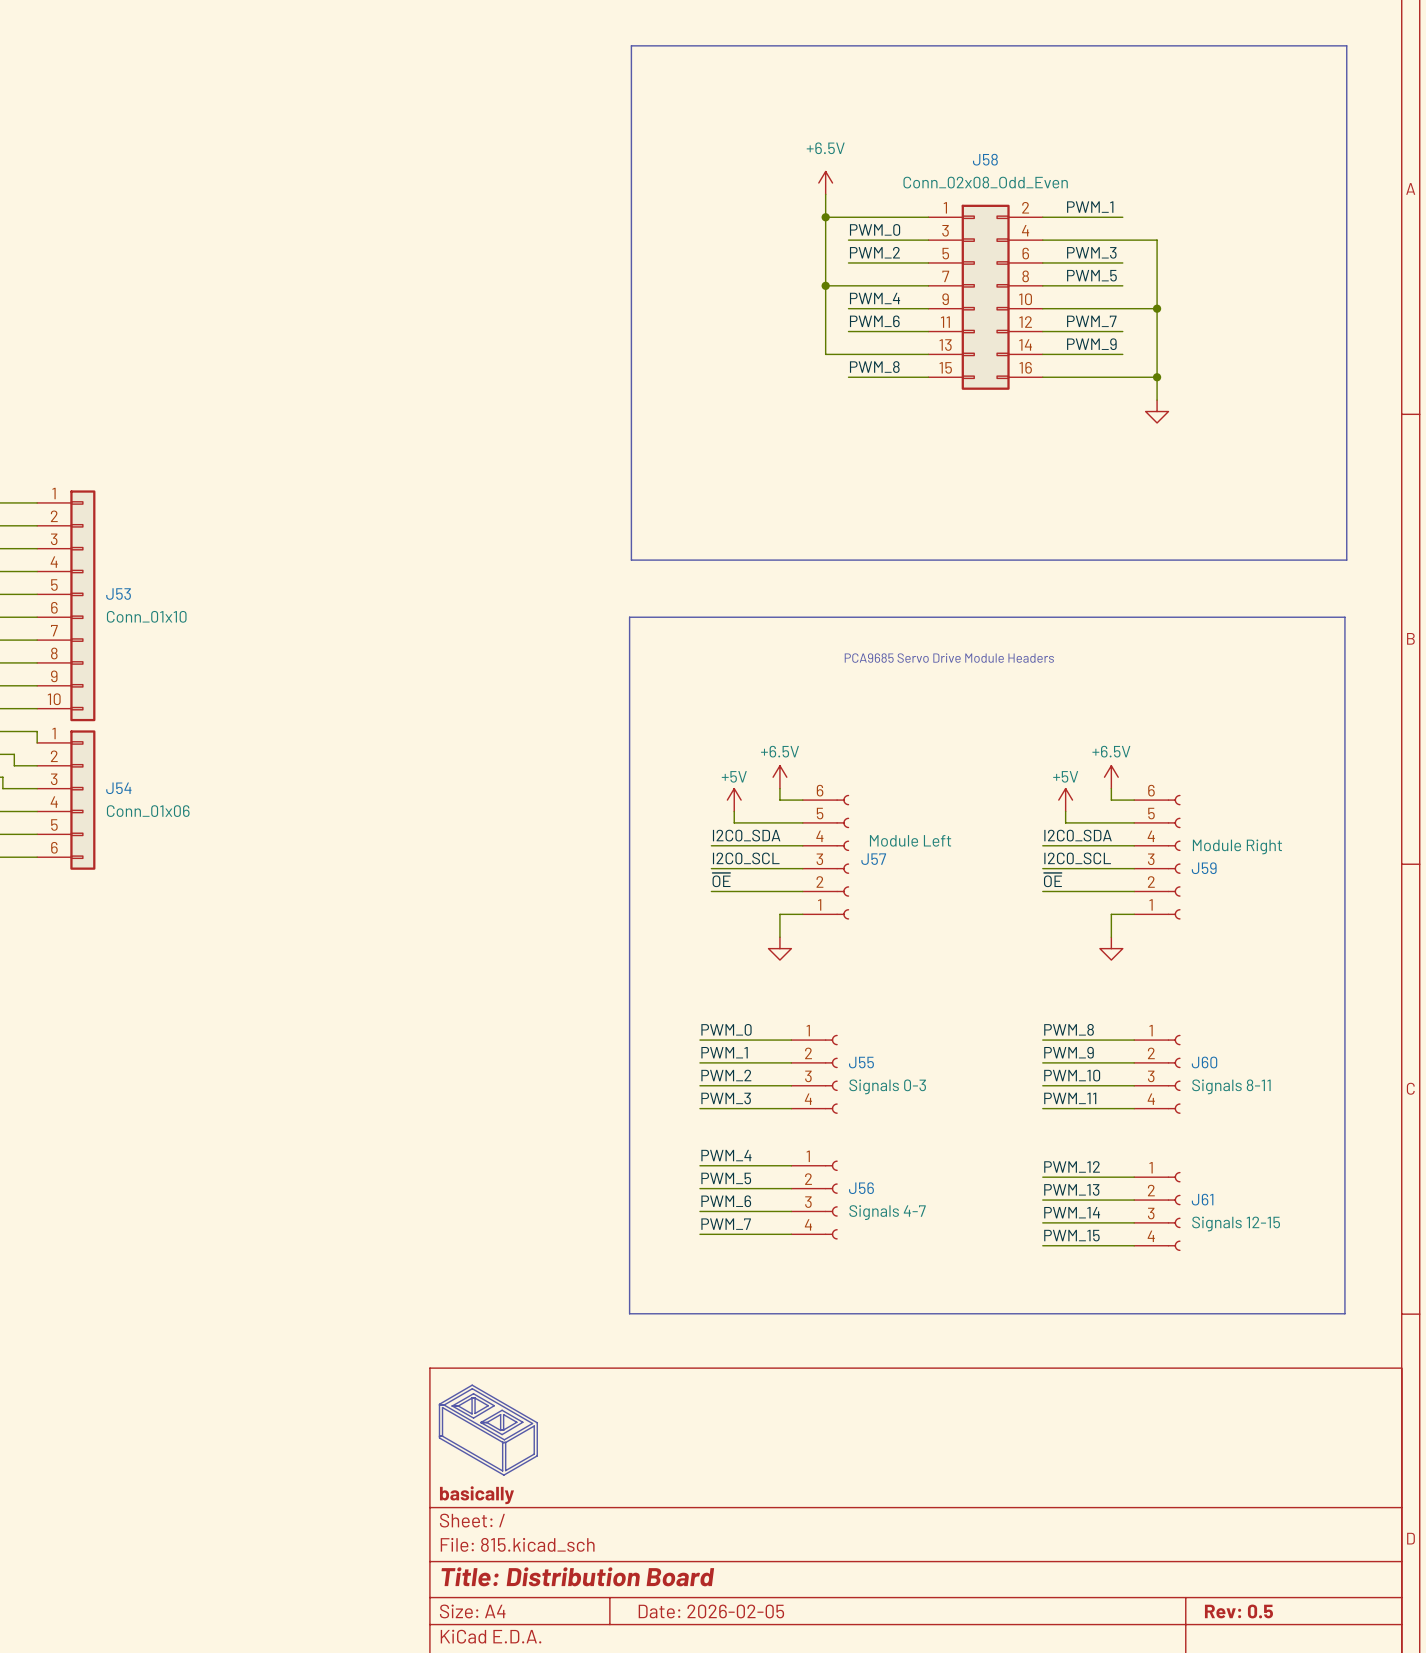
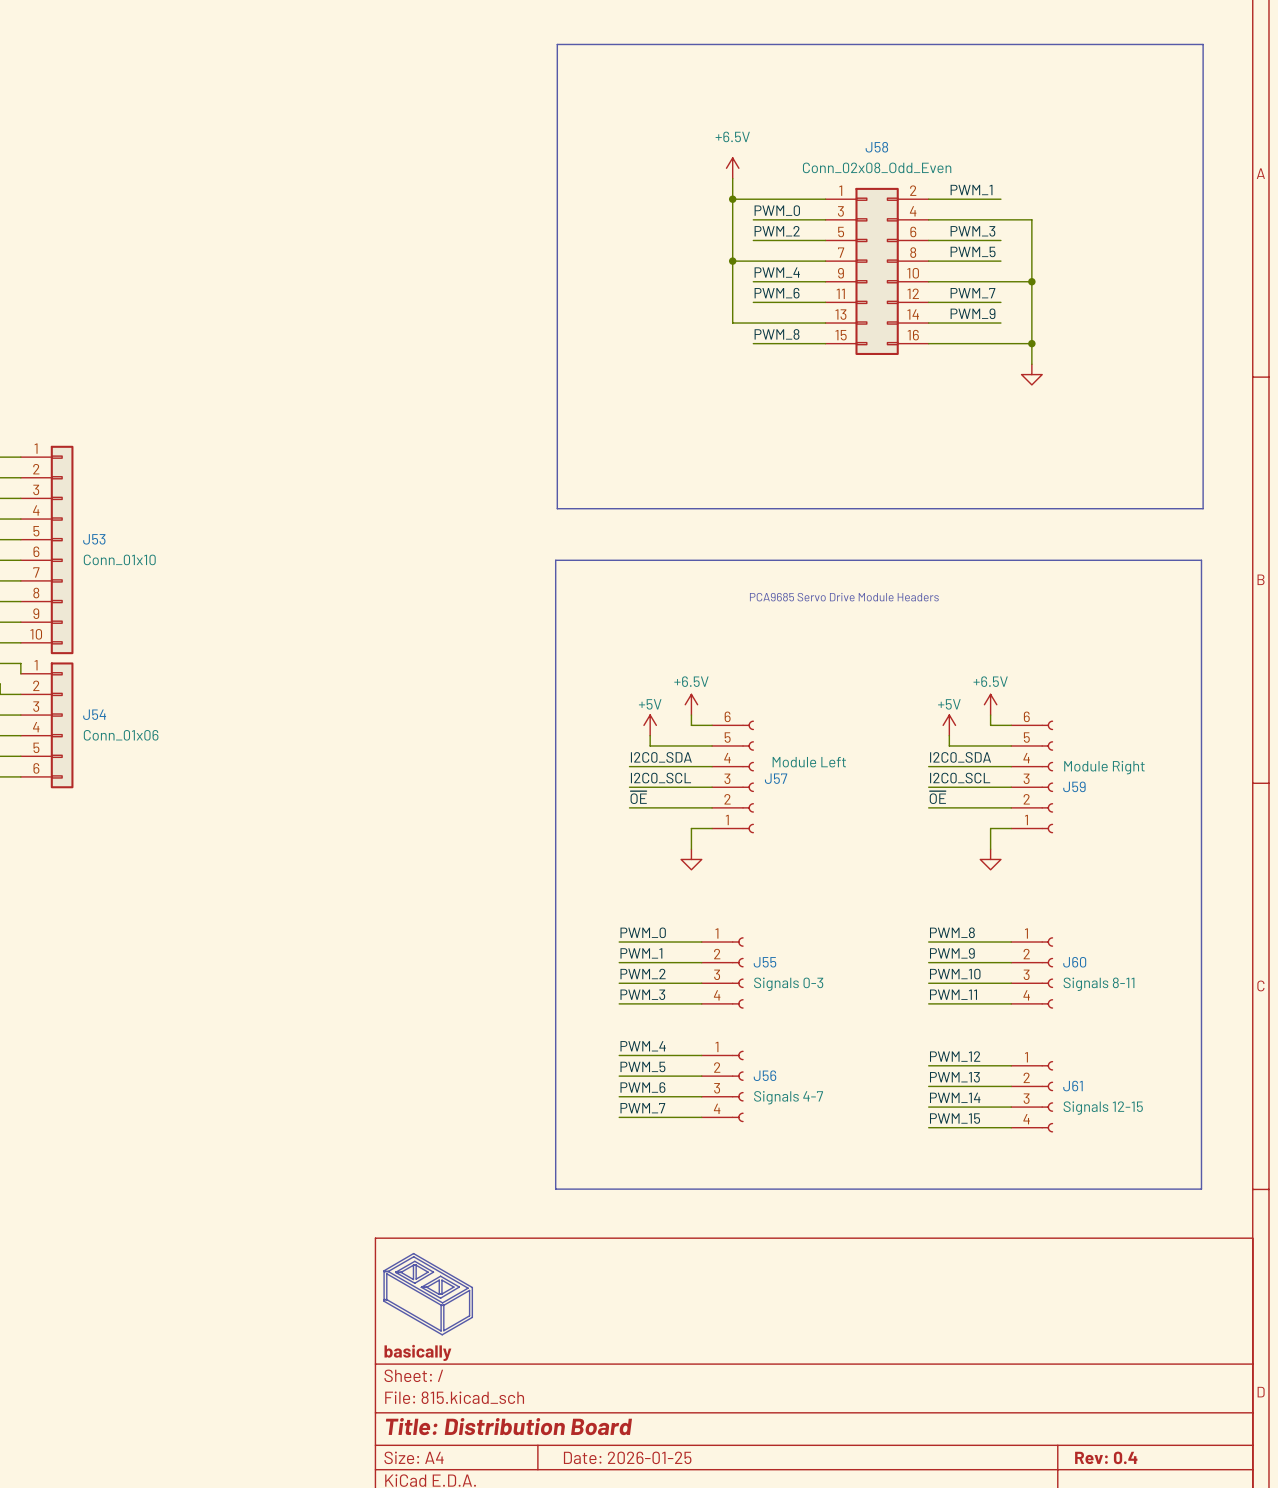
title block: Date: 2026-02-05 (711, 1611) -> Date: 2026-01-25 (627, 1457)
title block: Rev: 0.5 (1238, 1611) -> Rev: 0.4 (1106, 1457)

